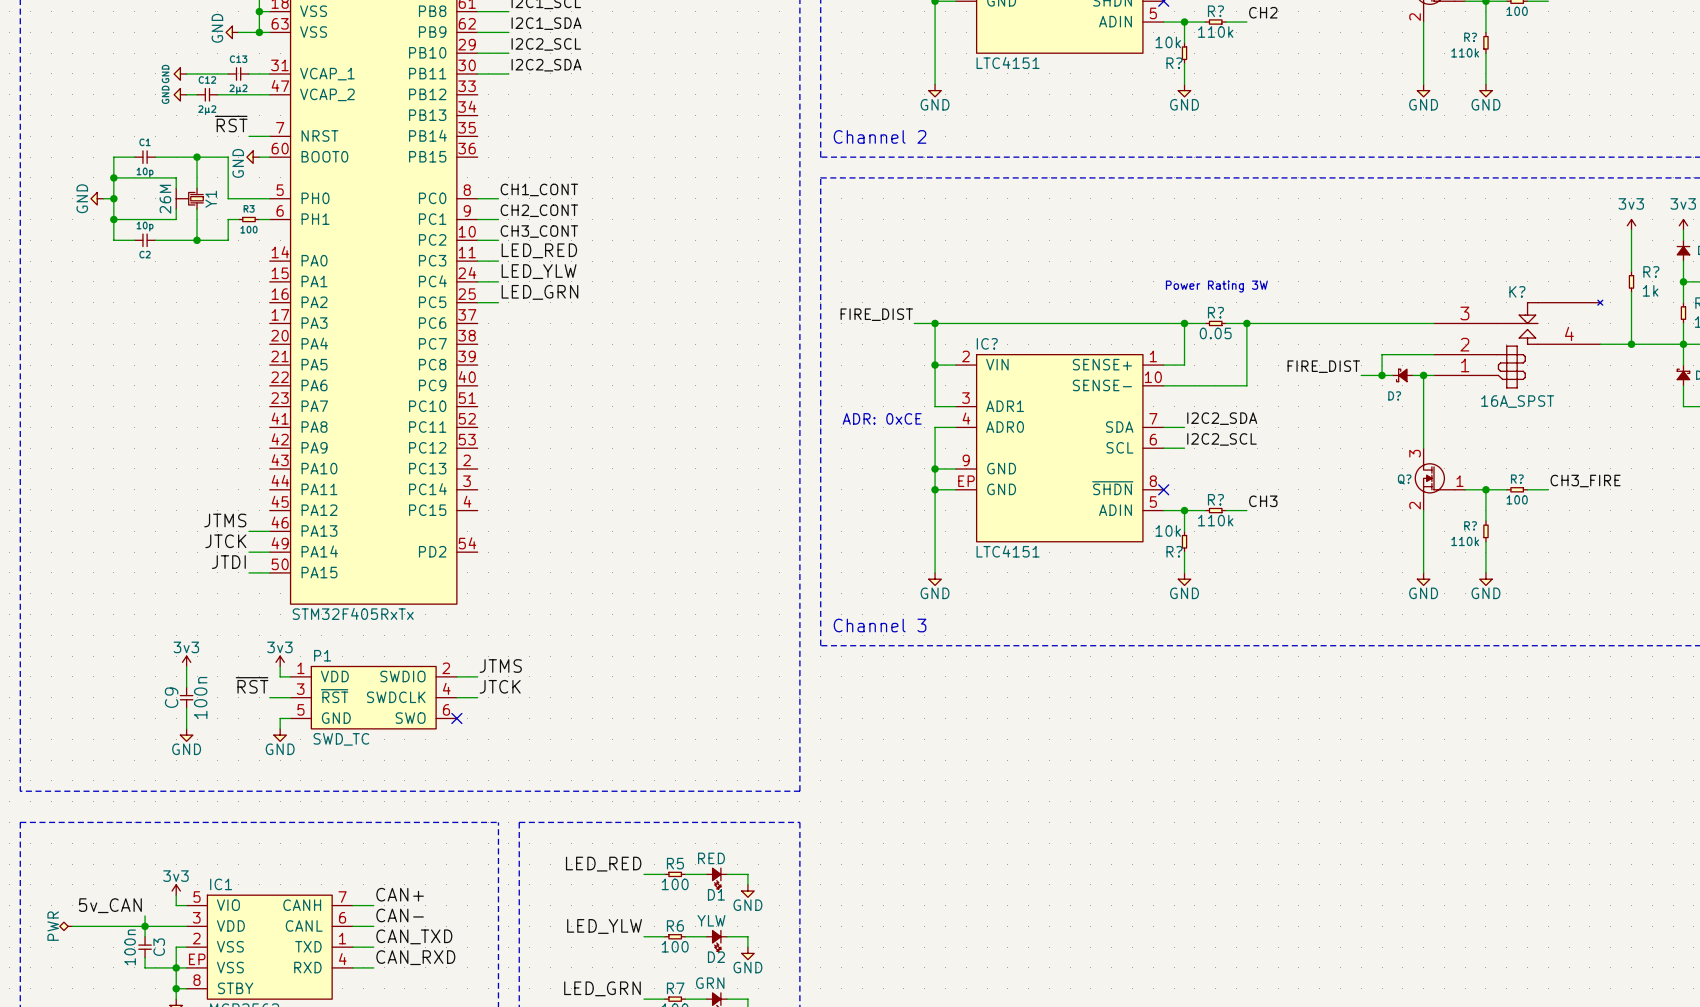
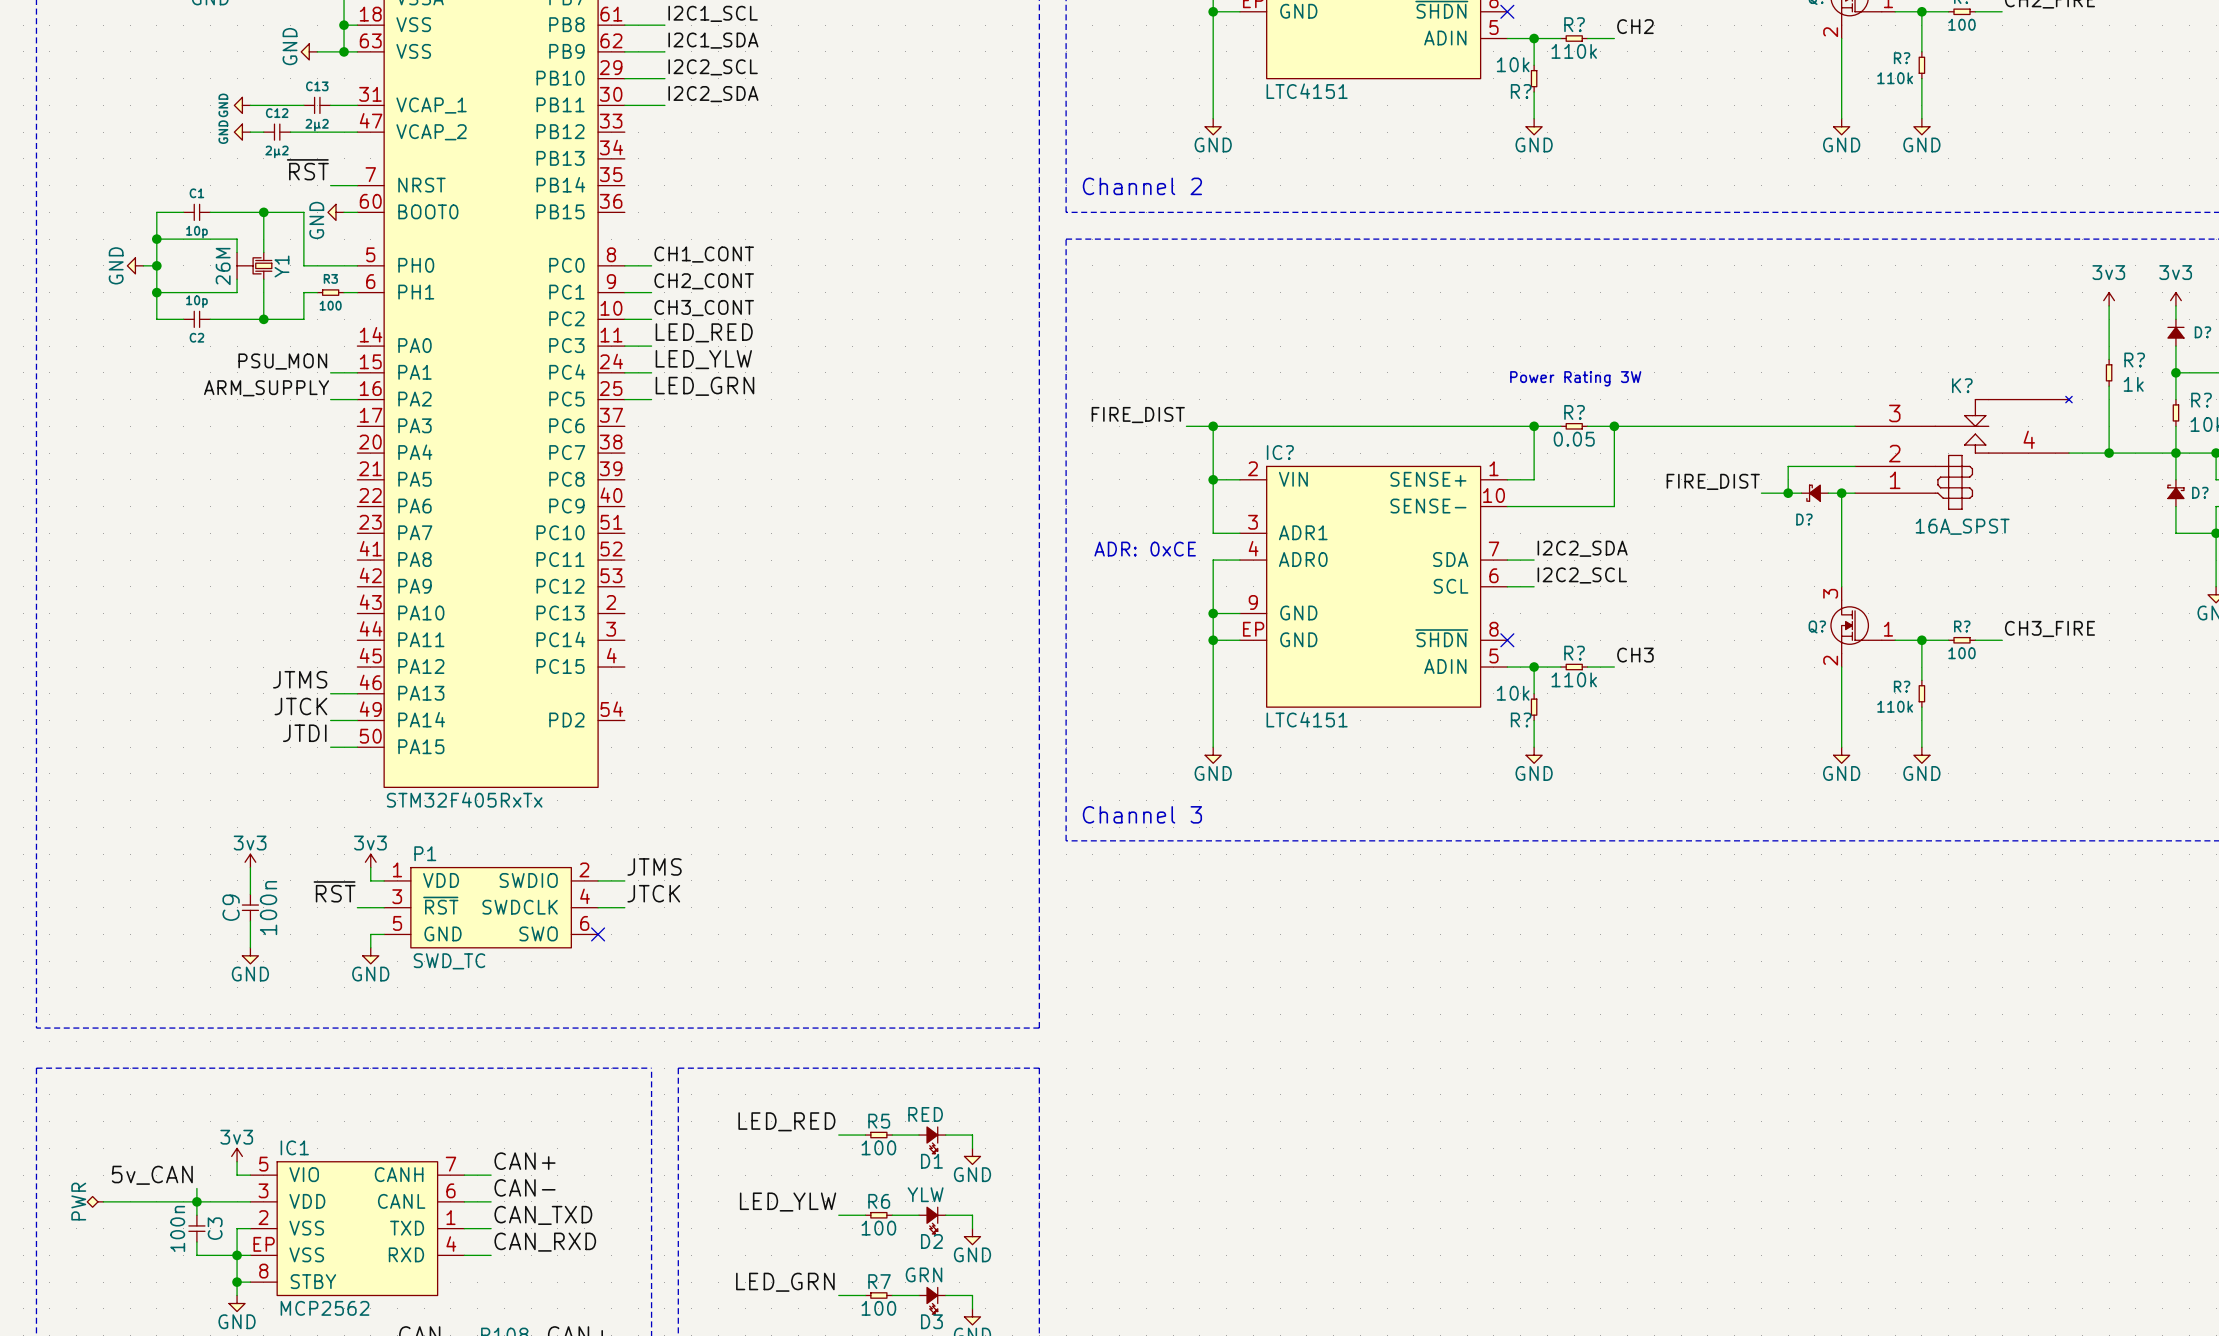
label: none -> PSU_MON (282, 361)
wire: none -> (330, 372) (357, 372)
label: none -> ARM_SUPPLY (266, 388)
wire: none -> (330, 399) (357, 399)

